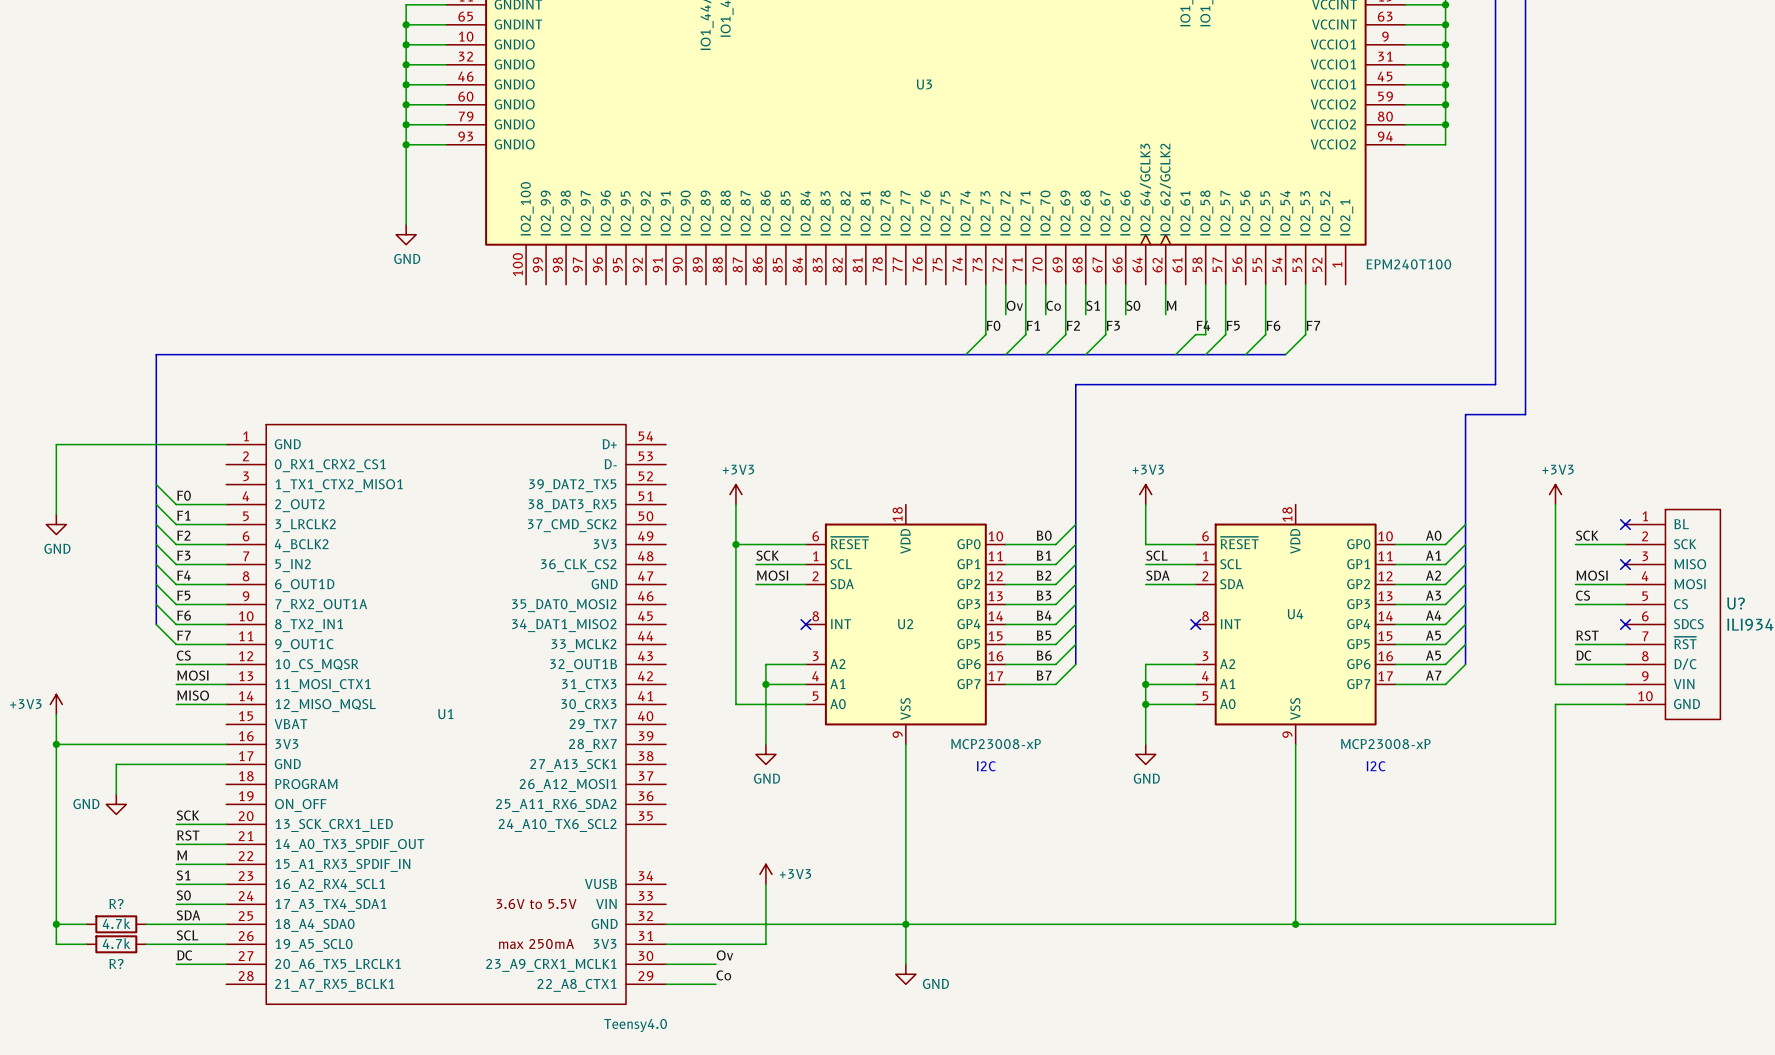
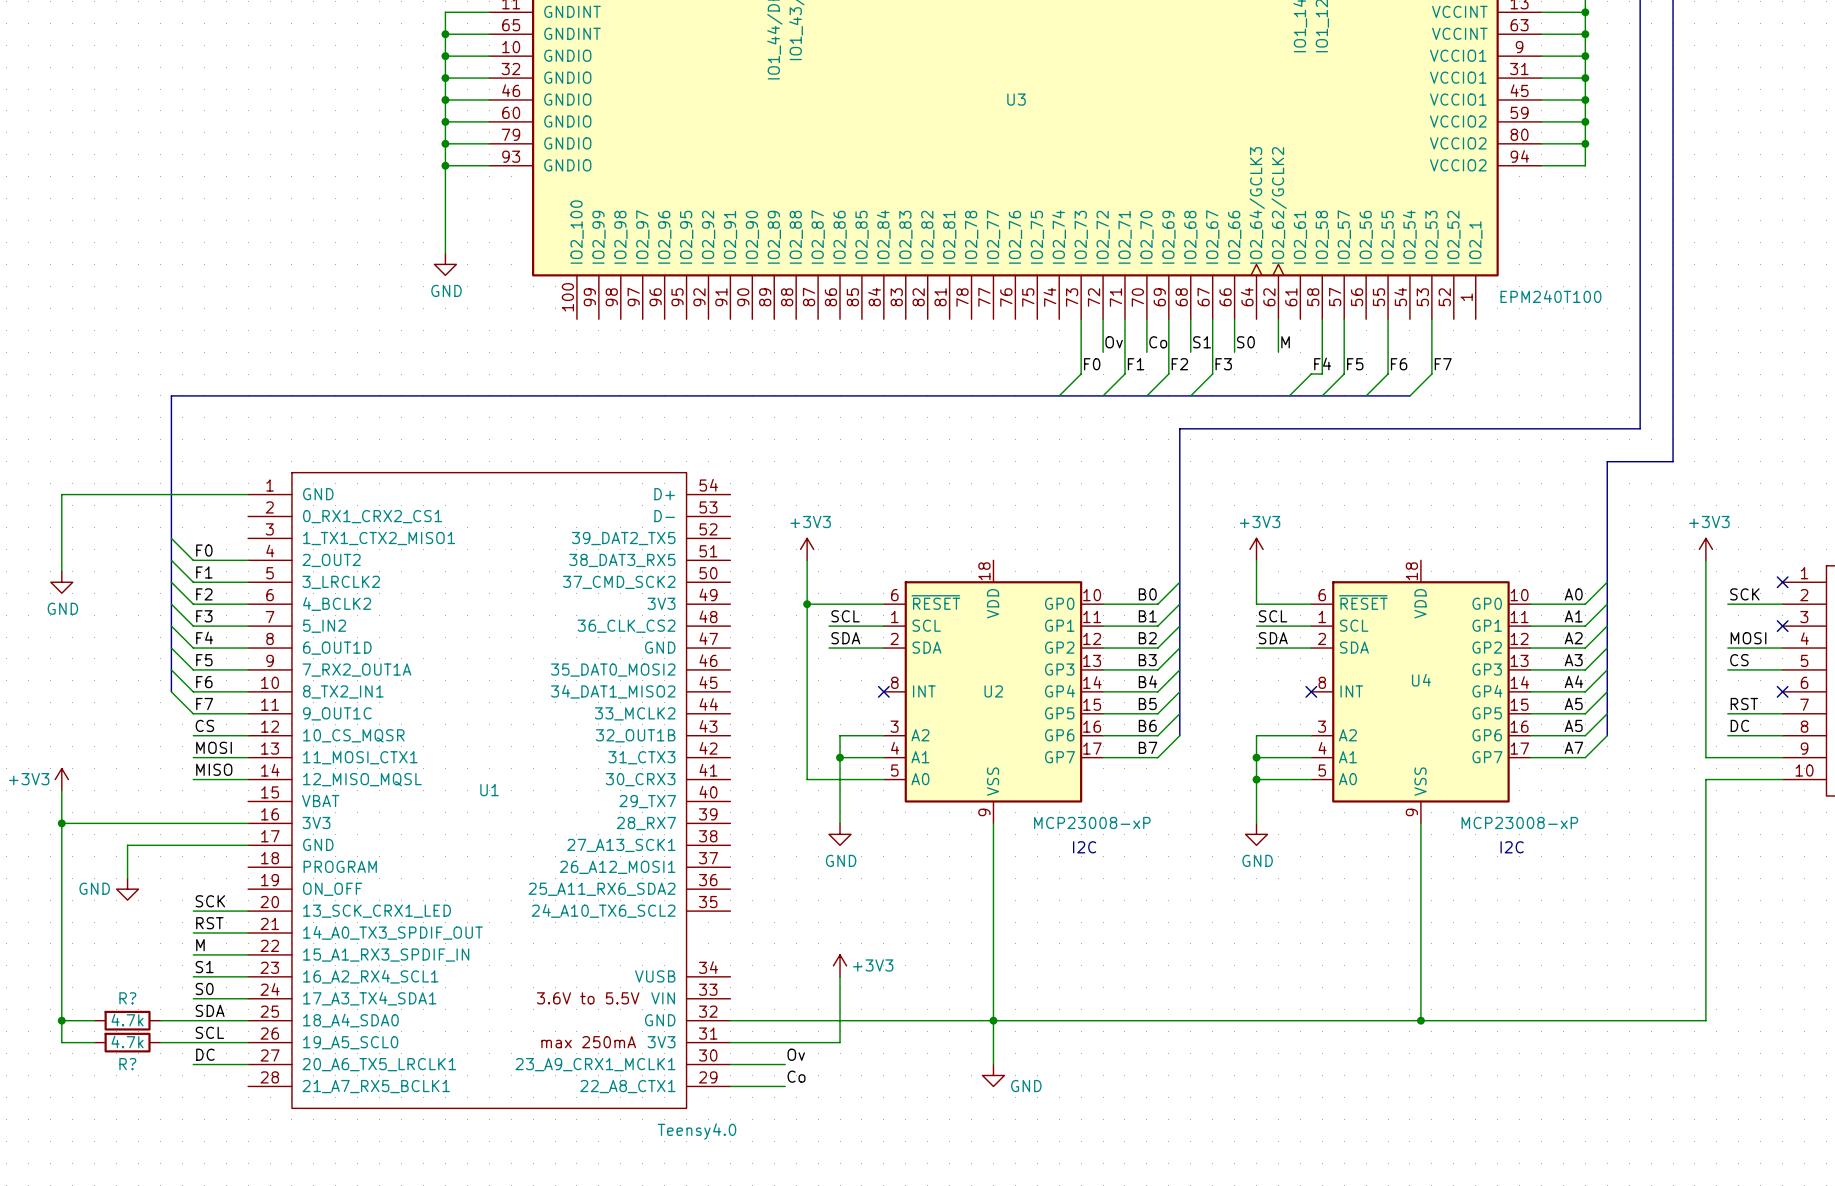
label: SCK (767, 555) -> SCL (845, 616)
label: MOSI (772, 575) -> SDA (845, 638)

